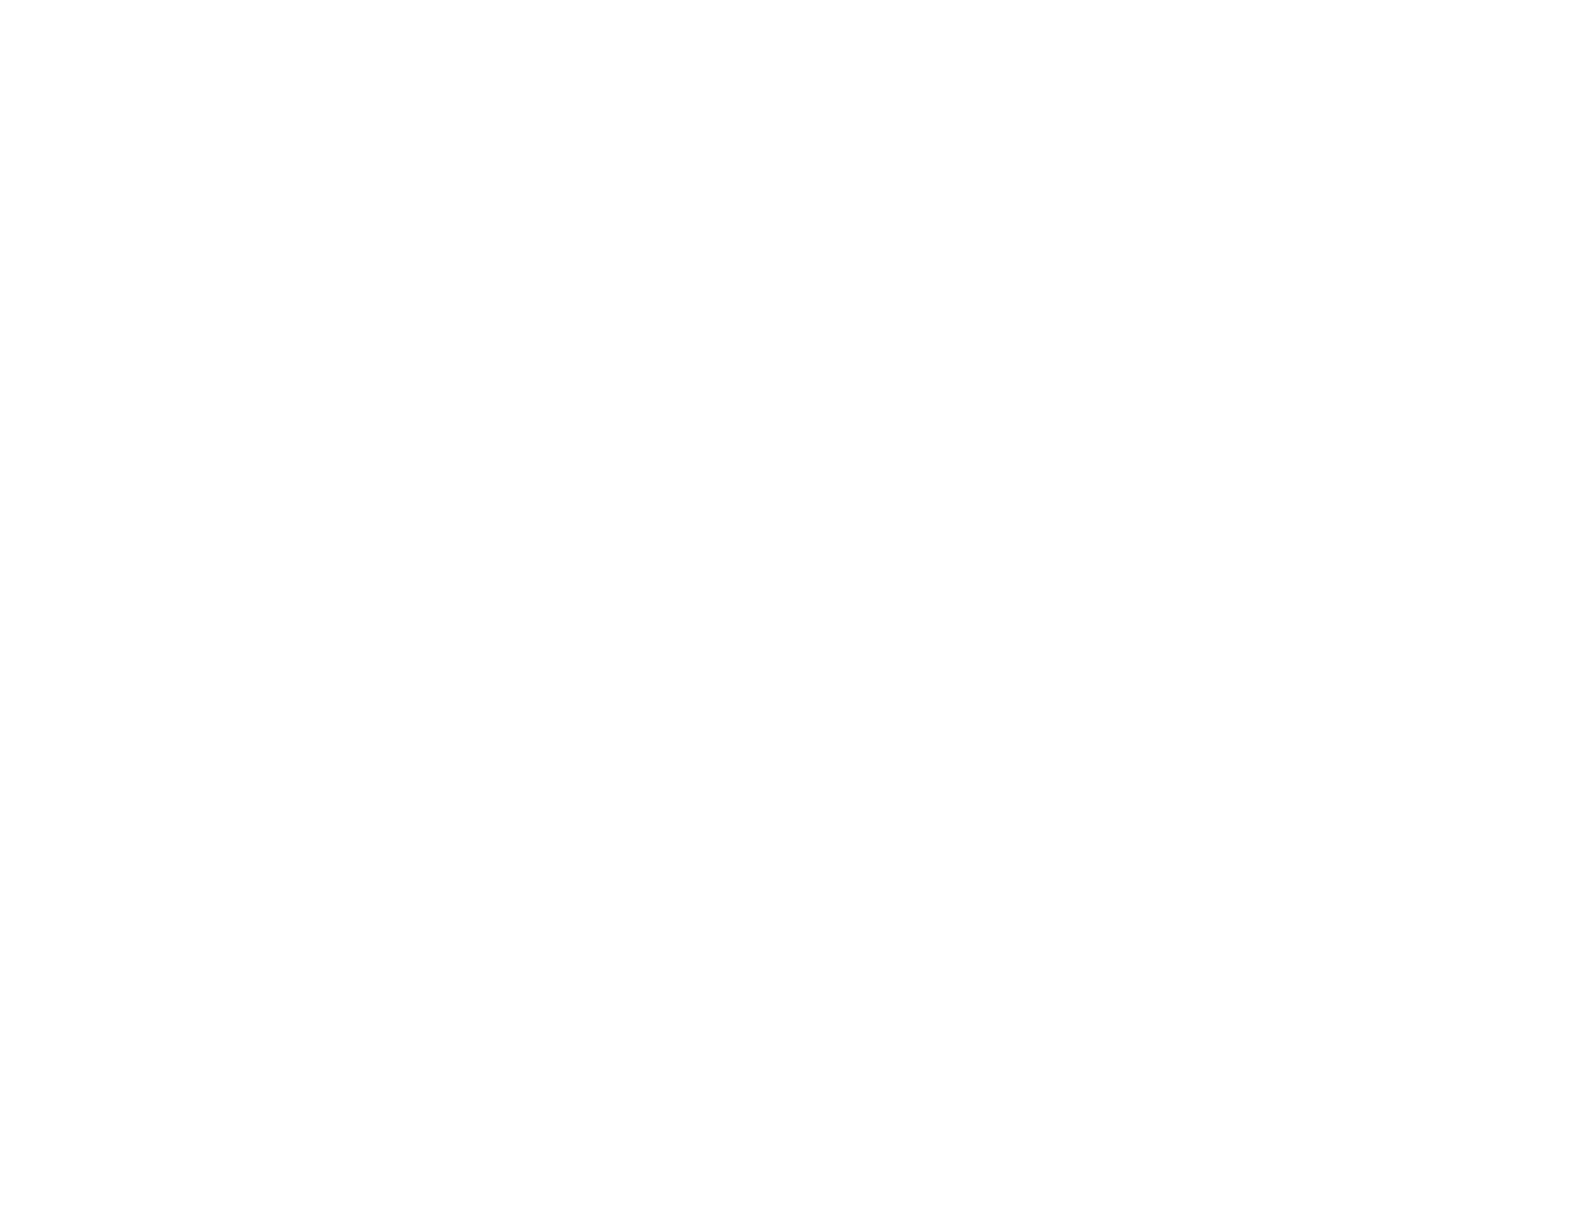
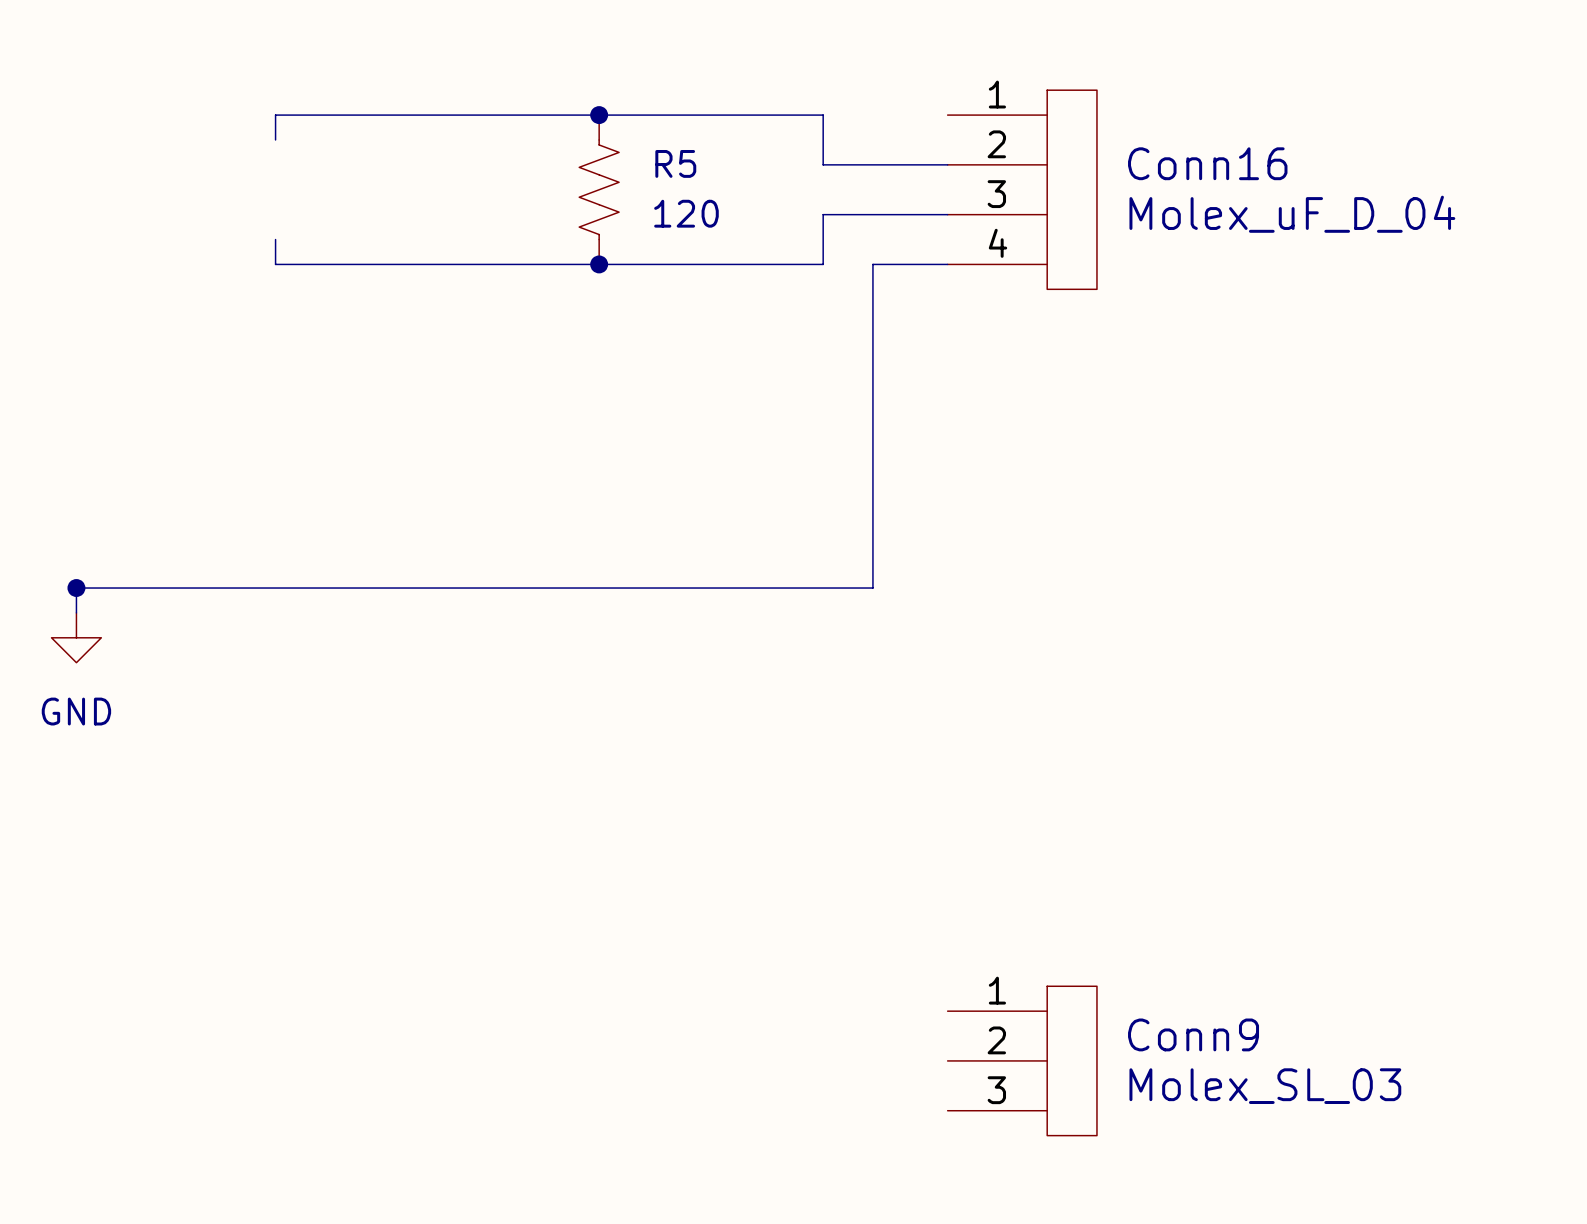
junction: none -> (599, 115)
wire: none -> (275, 139) (275, 115) (823, 115) (823, 164) (947, 164)
R5: none -> 120 (599, 189)
Conn16: none -> Molex_uF_D_04 (1022, 189)
wire: none -> (947, 214) (823, 214) (823, 264) (275, 264) (275, 239)
junction: none -> (599, 264)
wire: none -> (947, 264) (872, 264) (872, 588) (76, 588) (76, 612)
junction: none -> (76, 588)
power symbol: none -> GND (76, 637)
Conn9: none -> Molex_SL_03 (1022, 1060)

